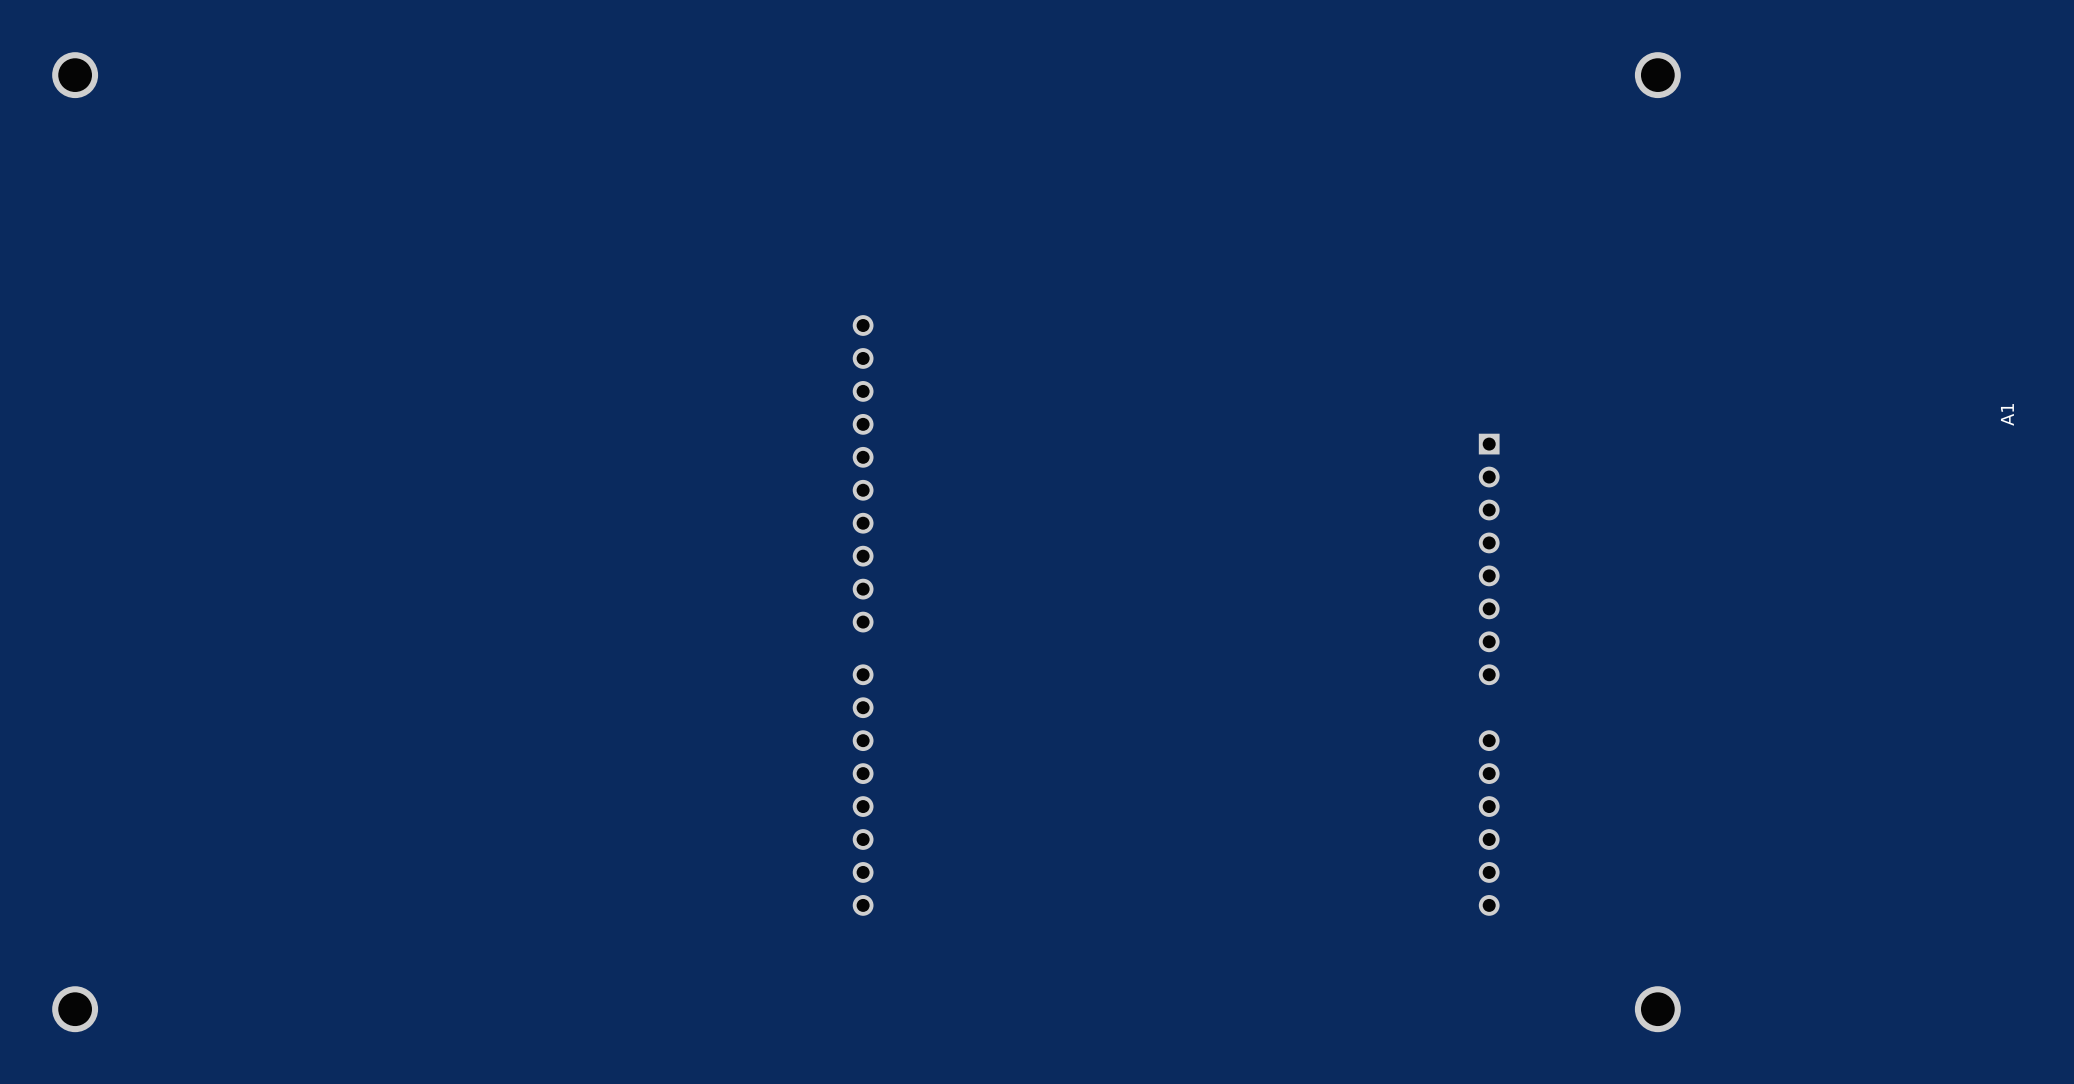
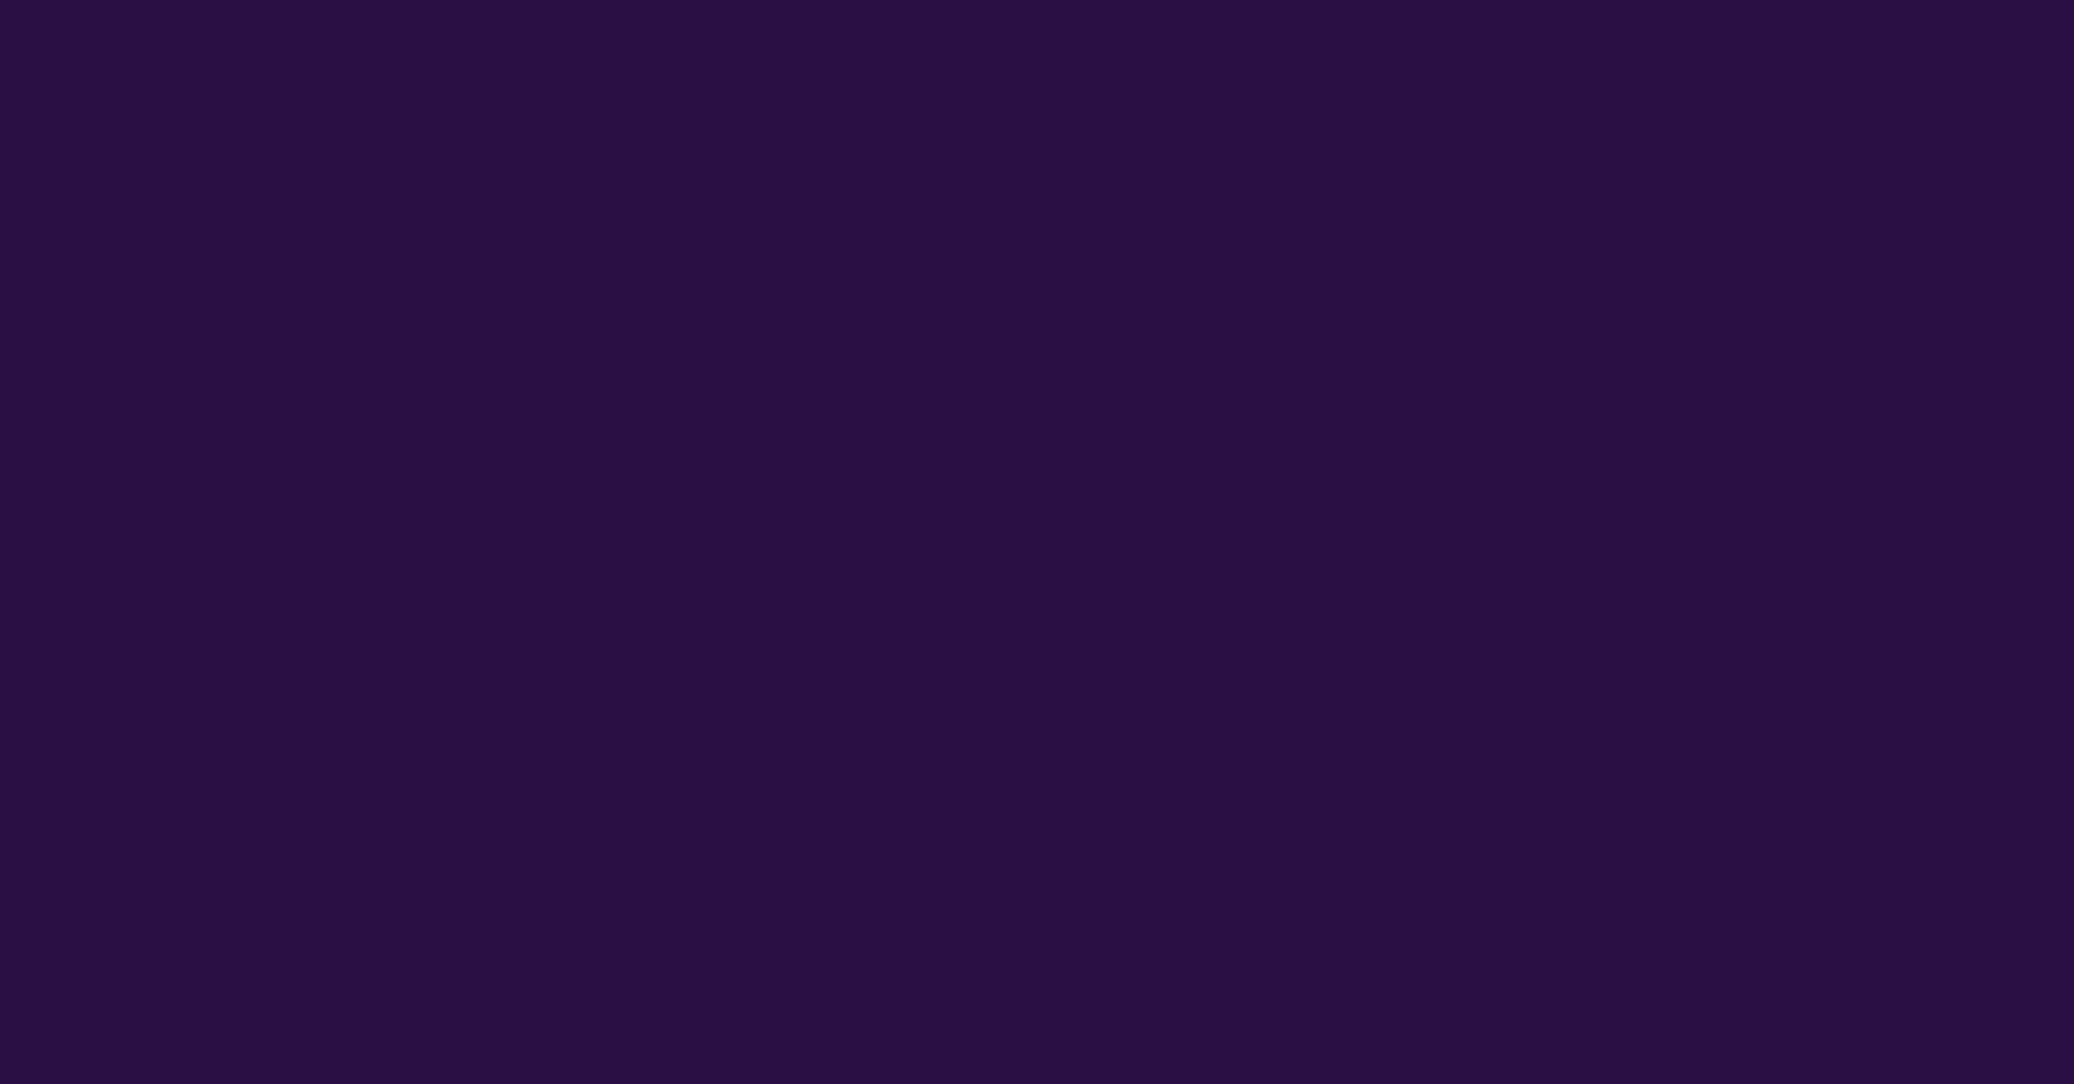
A1: (866, 542) -> none

